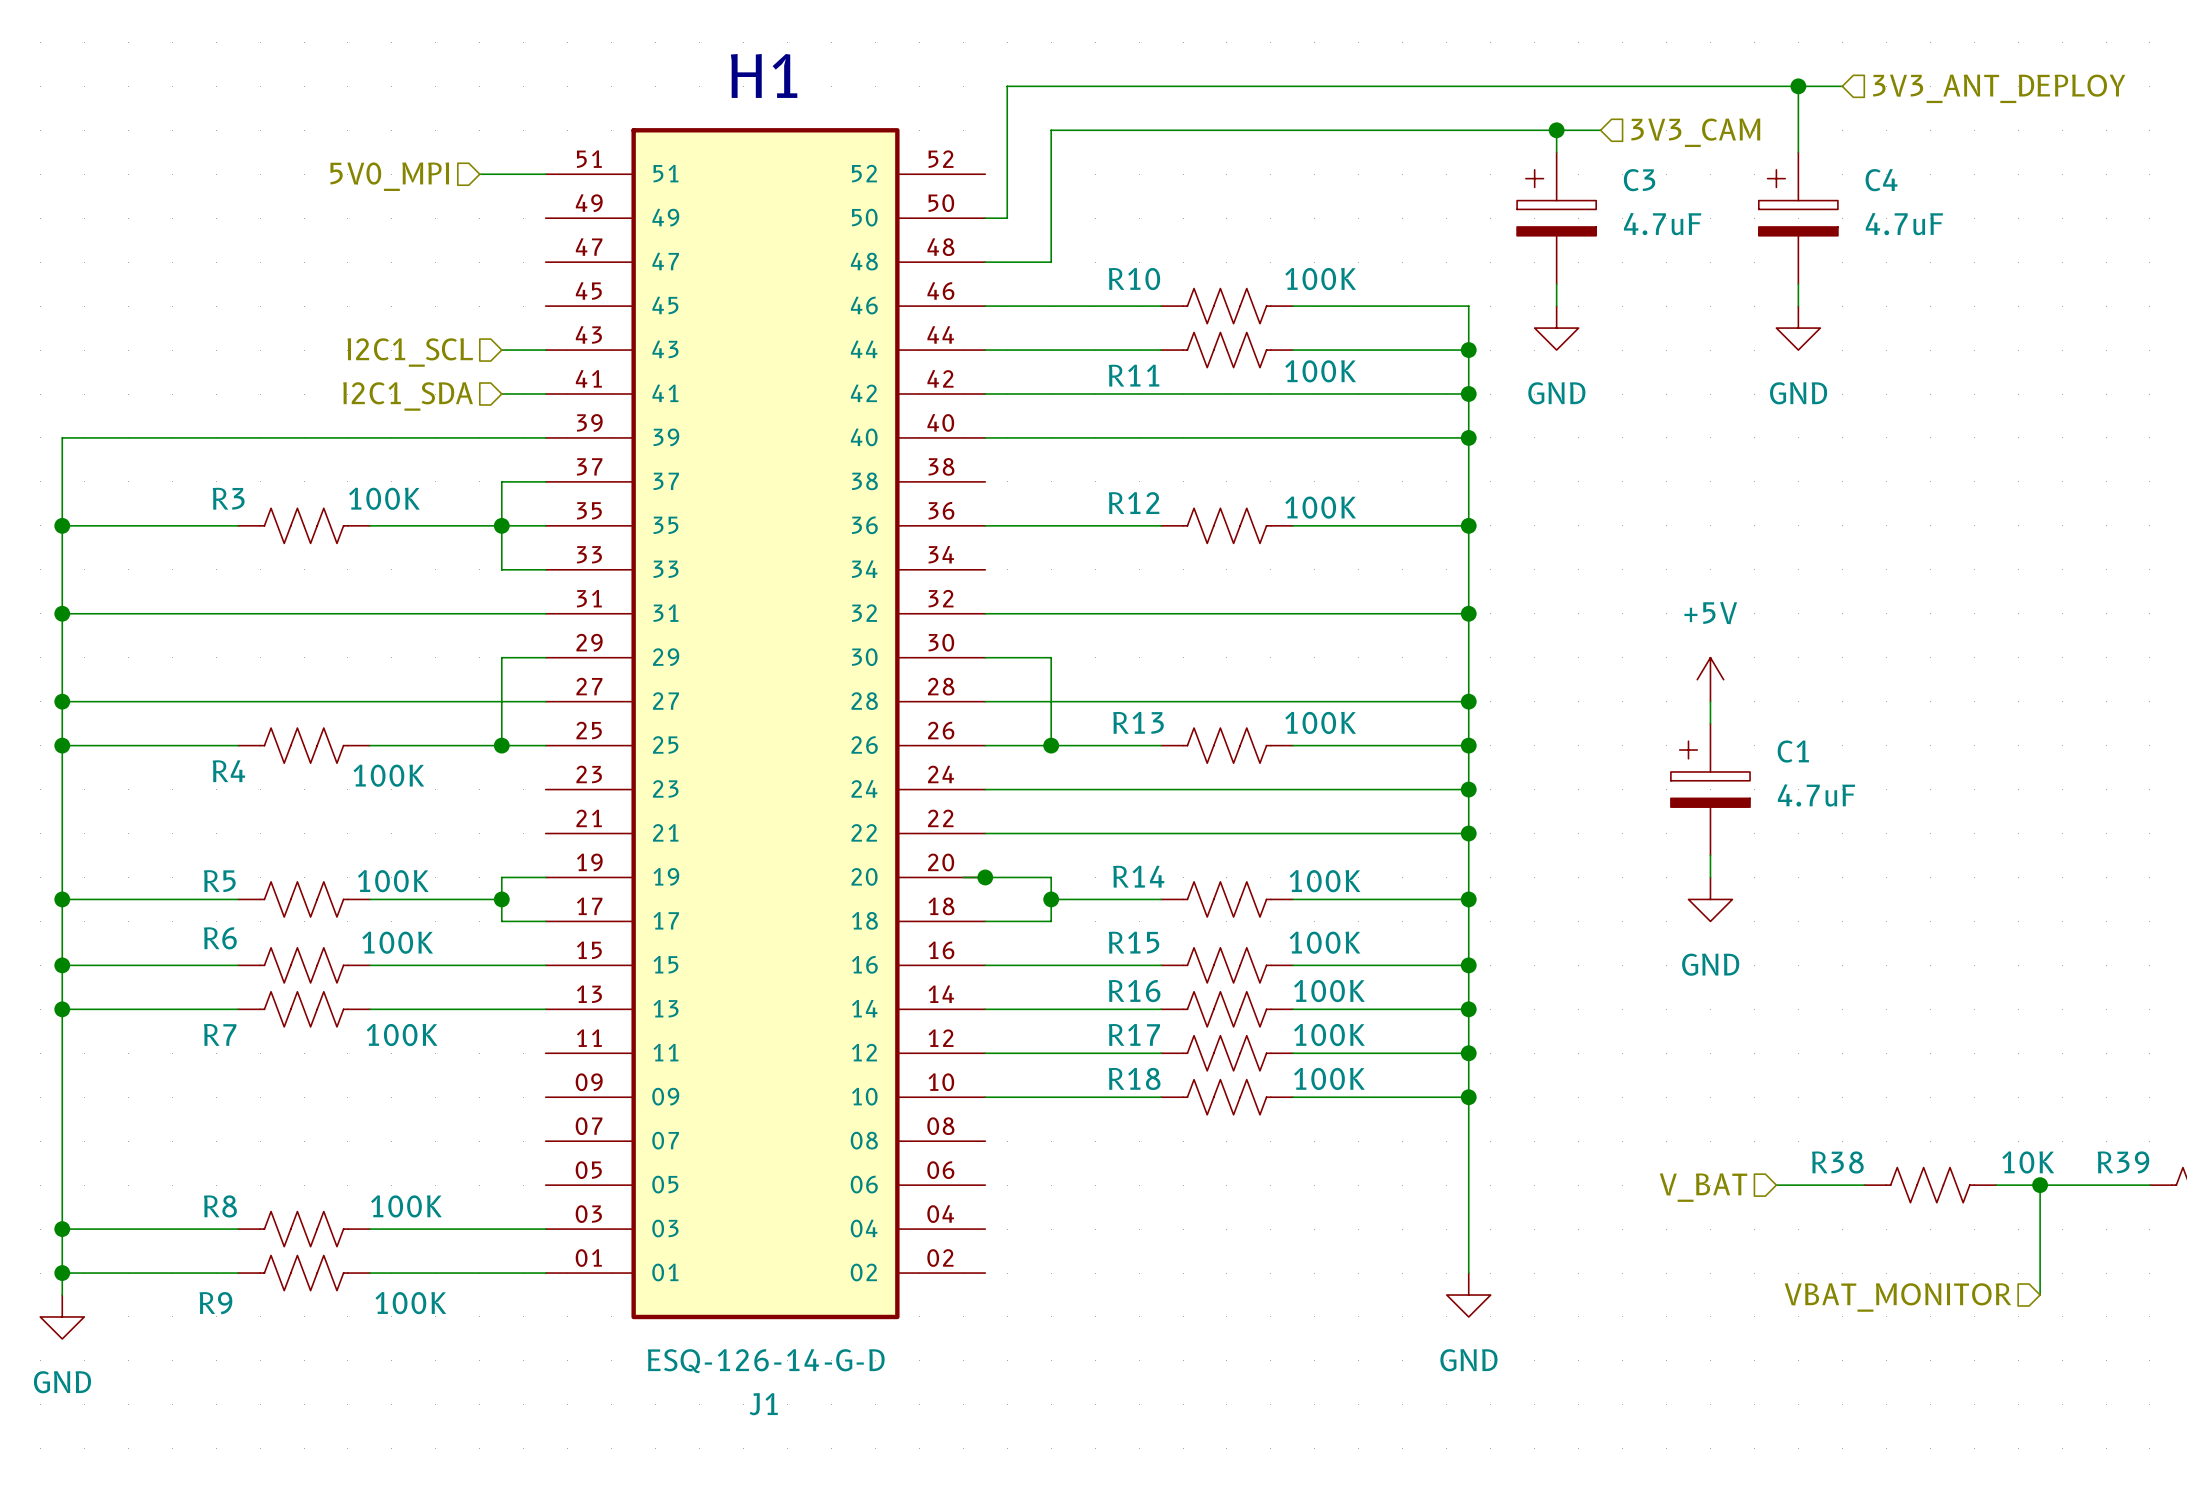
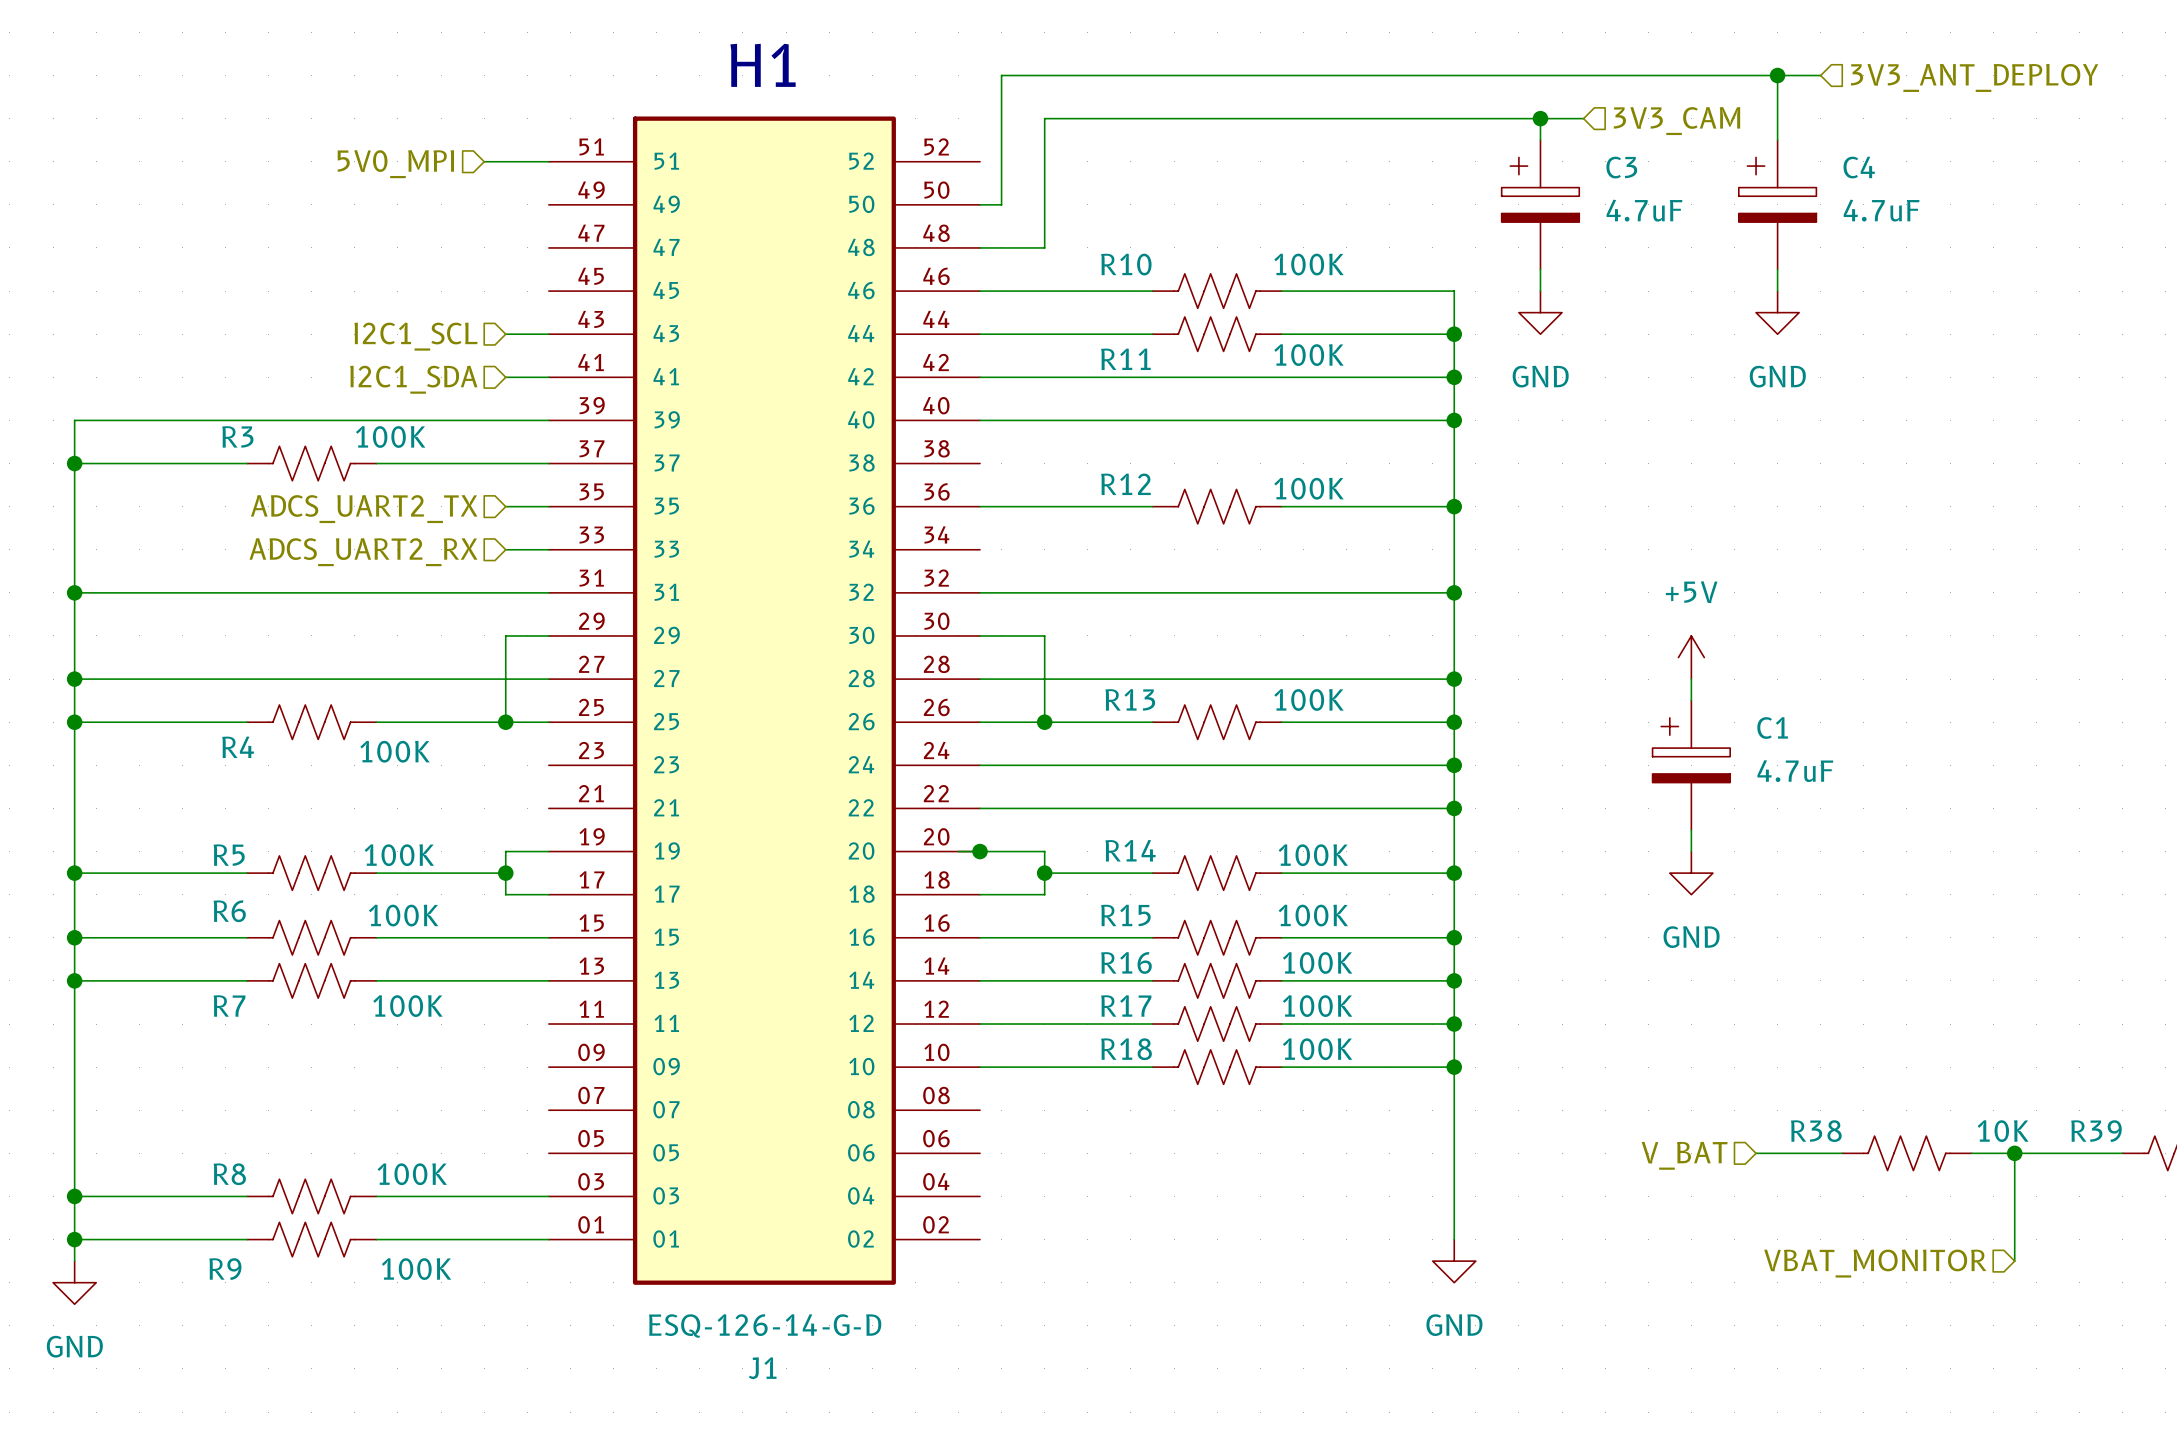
wire: (501, 481) (501, 569) -> (505, 463) (376, 463)
wire: (62, 525) (238, 525) -> (74, 463) (247, 463)
junction position: (62, 525) -> (74, 463)
R3 position: (304, 525) -> (311, 463)
wire: (369, 525) (501, 525) -> none
junction: (501, 525) -> none
hierarchical label: none -> ADCS_UART2_TX (364, 509)
hierarchical label: none -> ADCS_UART2_RX (363, 552)

